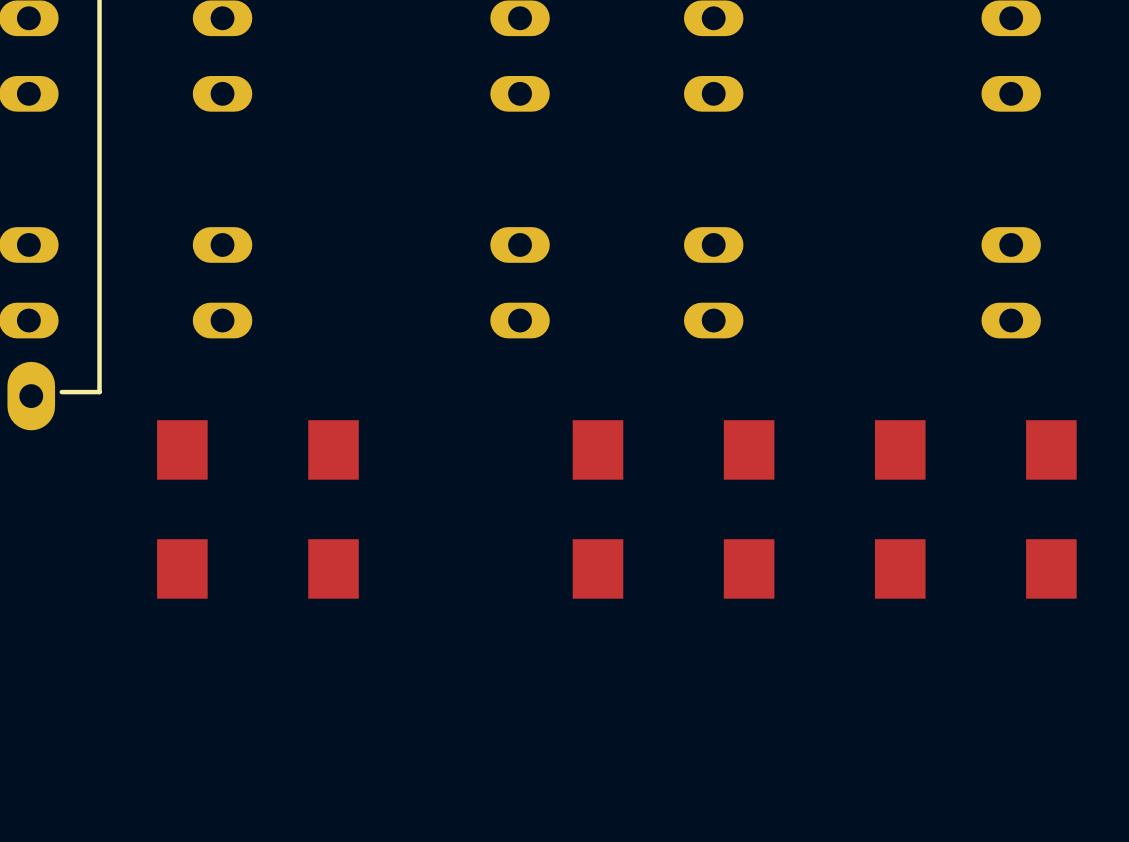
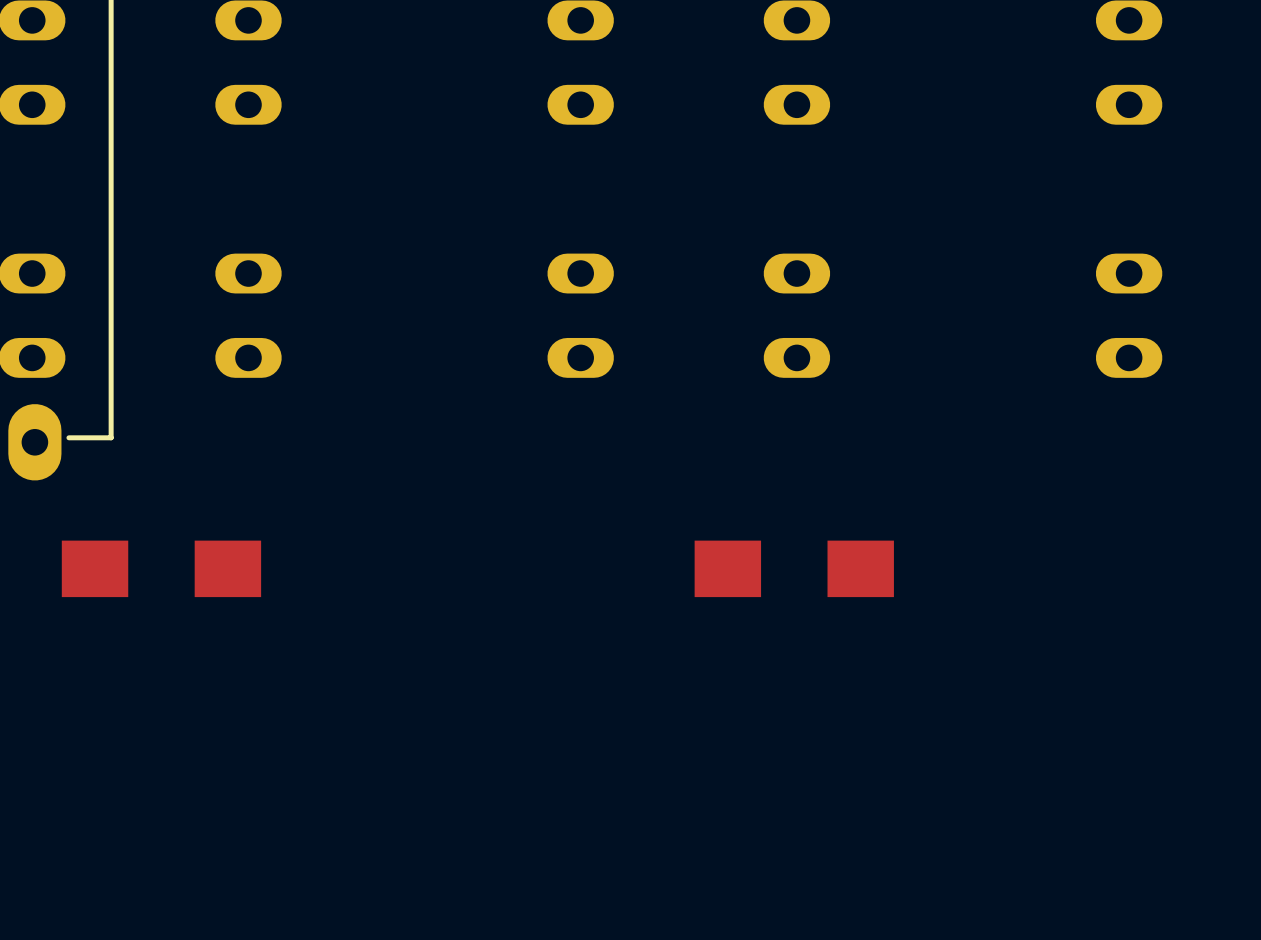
part rotation: 0° (182, 509) -> 90° clockwise (161, 568)
part: (333, 509) -> none
part: (597, 509) -> none
part rotation: 0° (749, 509) -> 90° clockwise (794, 568)
part: (900, 509) -> none
part: (1051, 509) -> none

